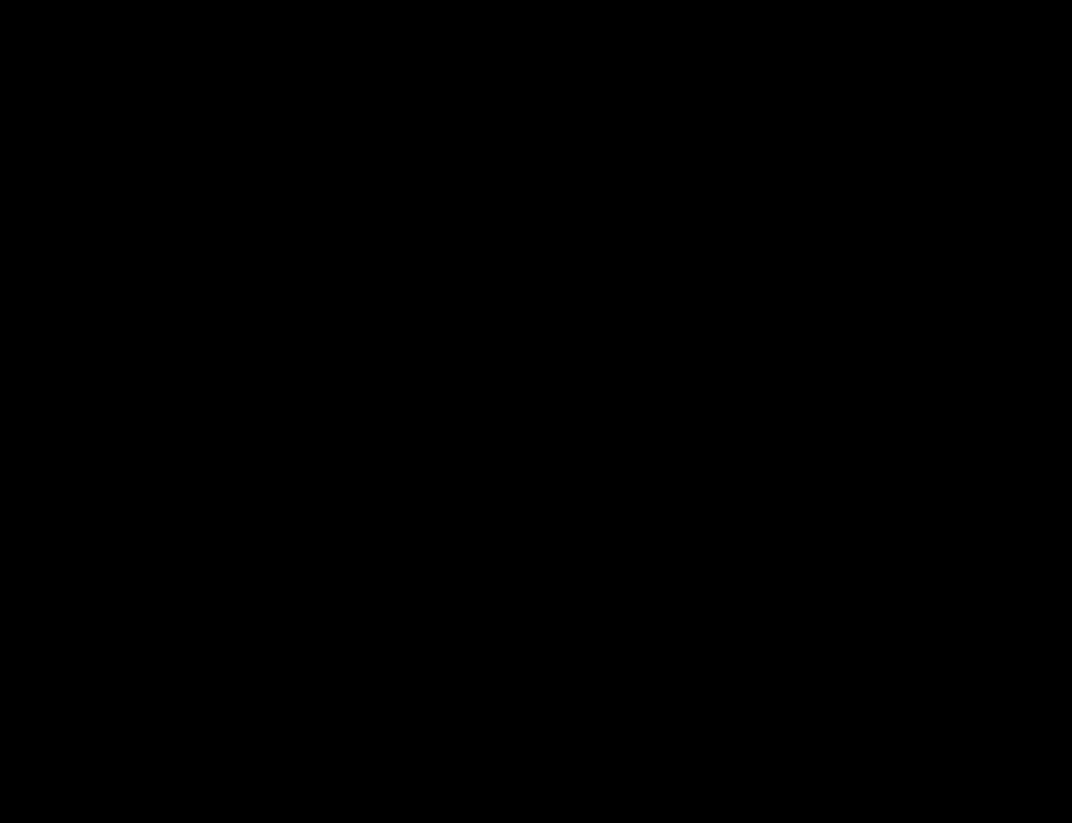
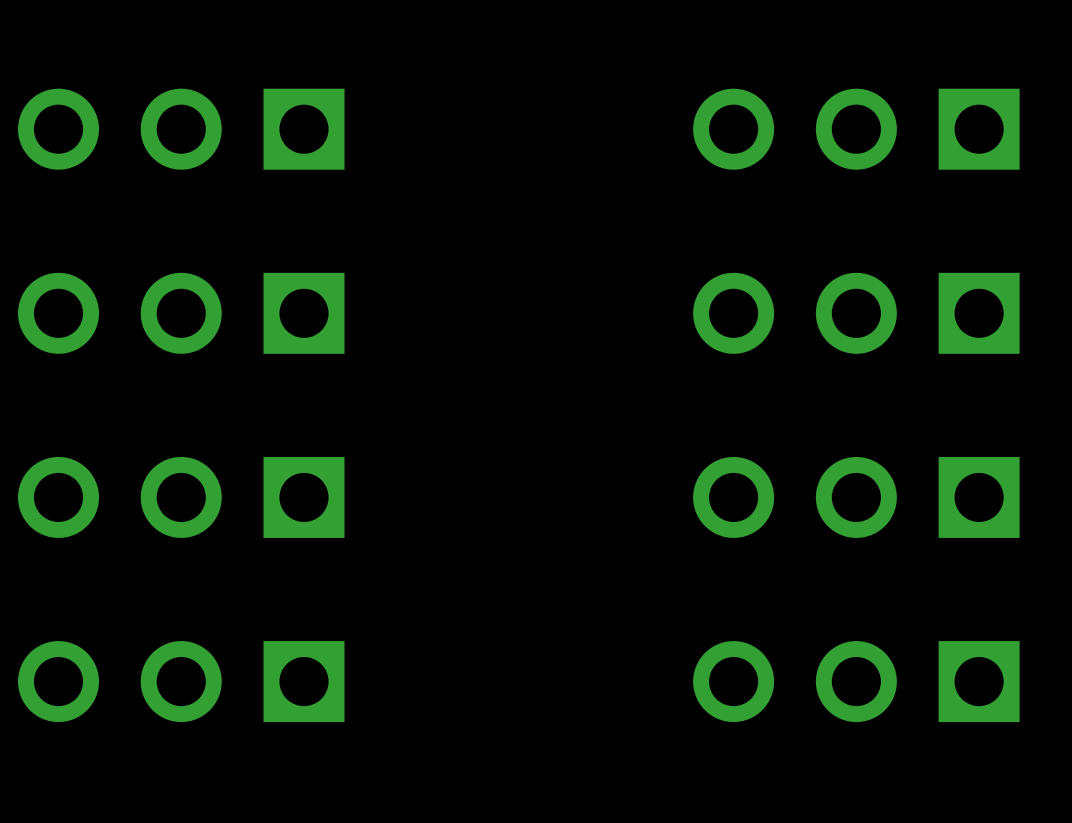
part: none -> (181, 129)
part: none -> (856, 129)
part: none -> (181, 313)
part: none -> (856, 313)
part: none -> (181, 497)
part: none -> (856, 497)
part: none -> (181, 681)
part: none -> (856, 681)

